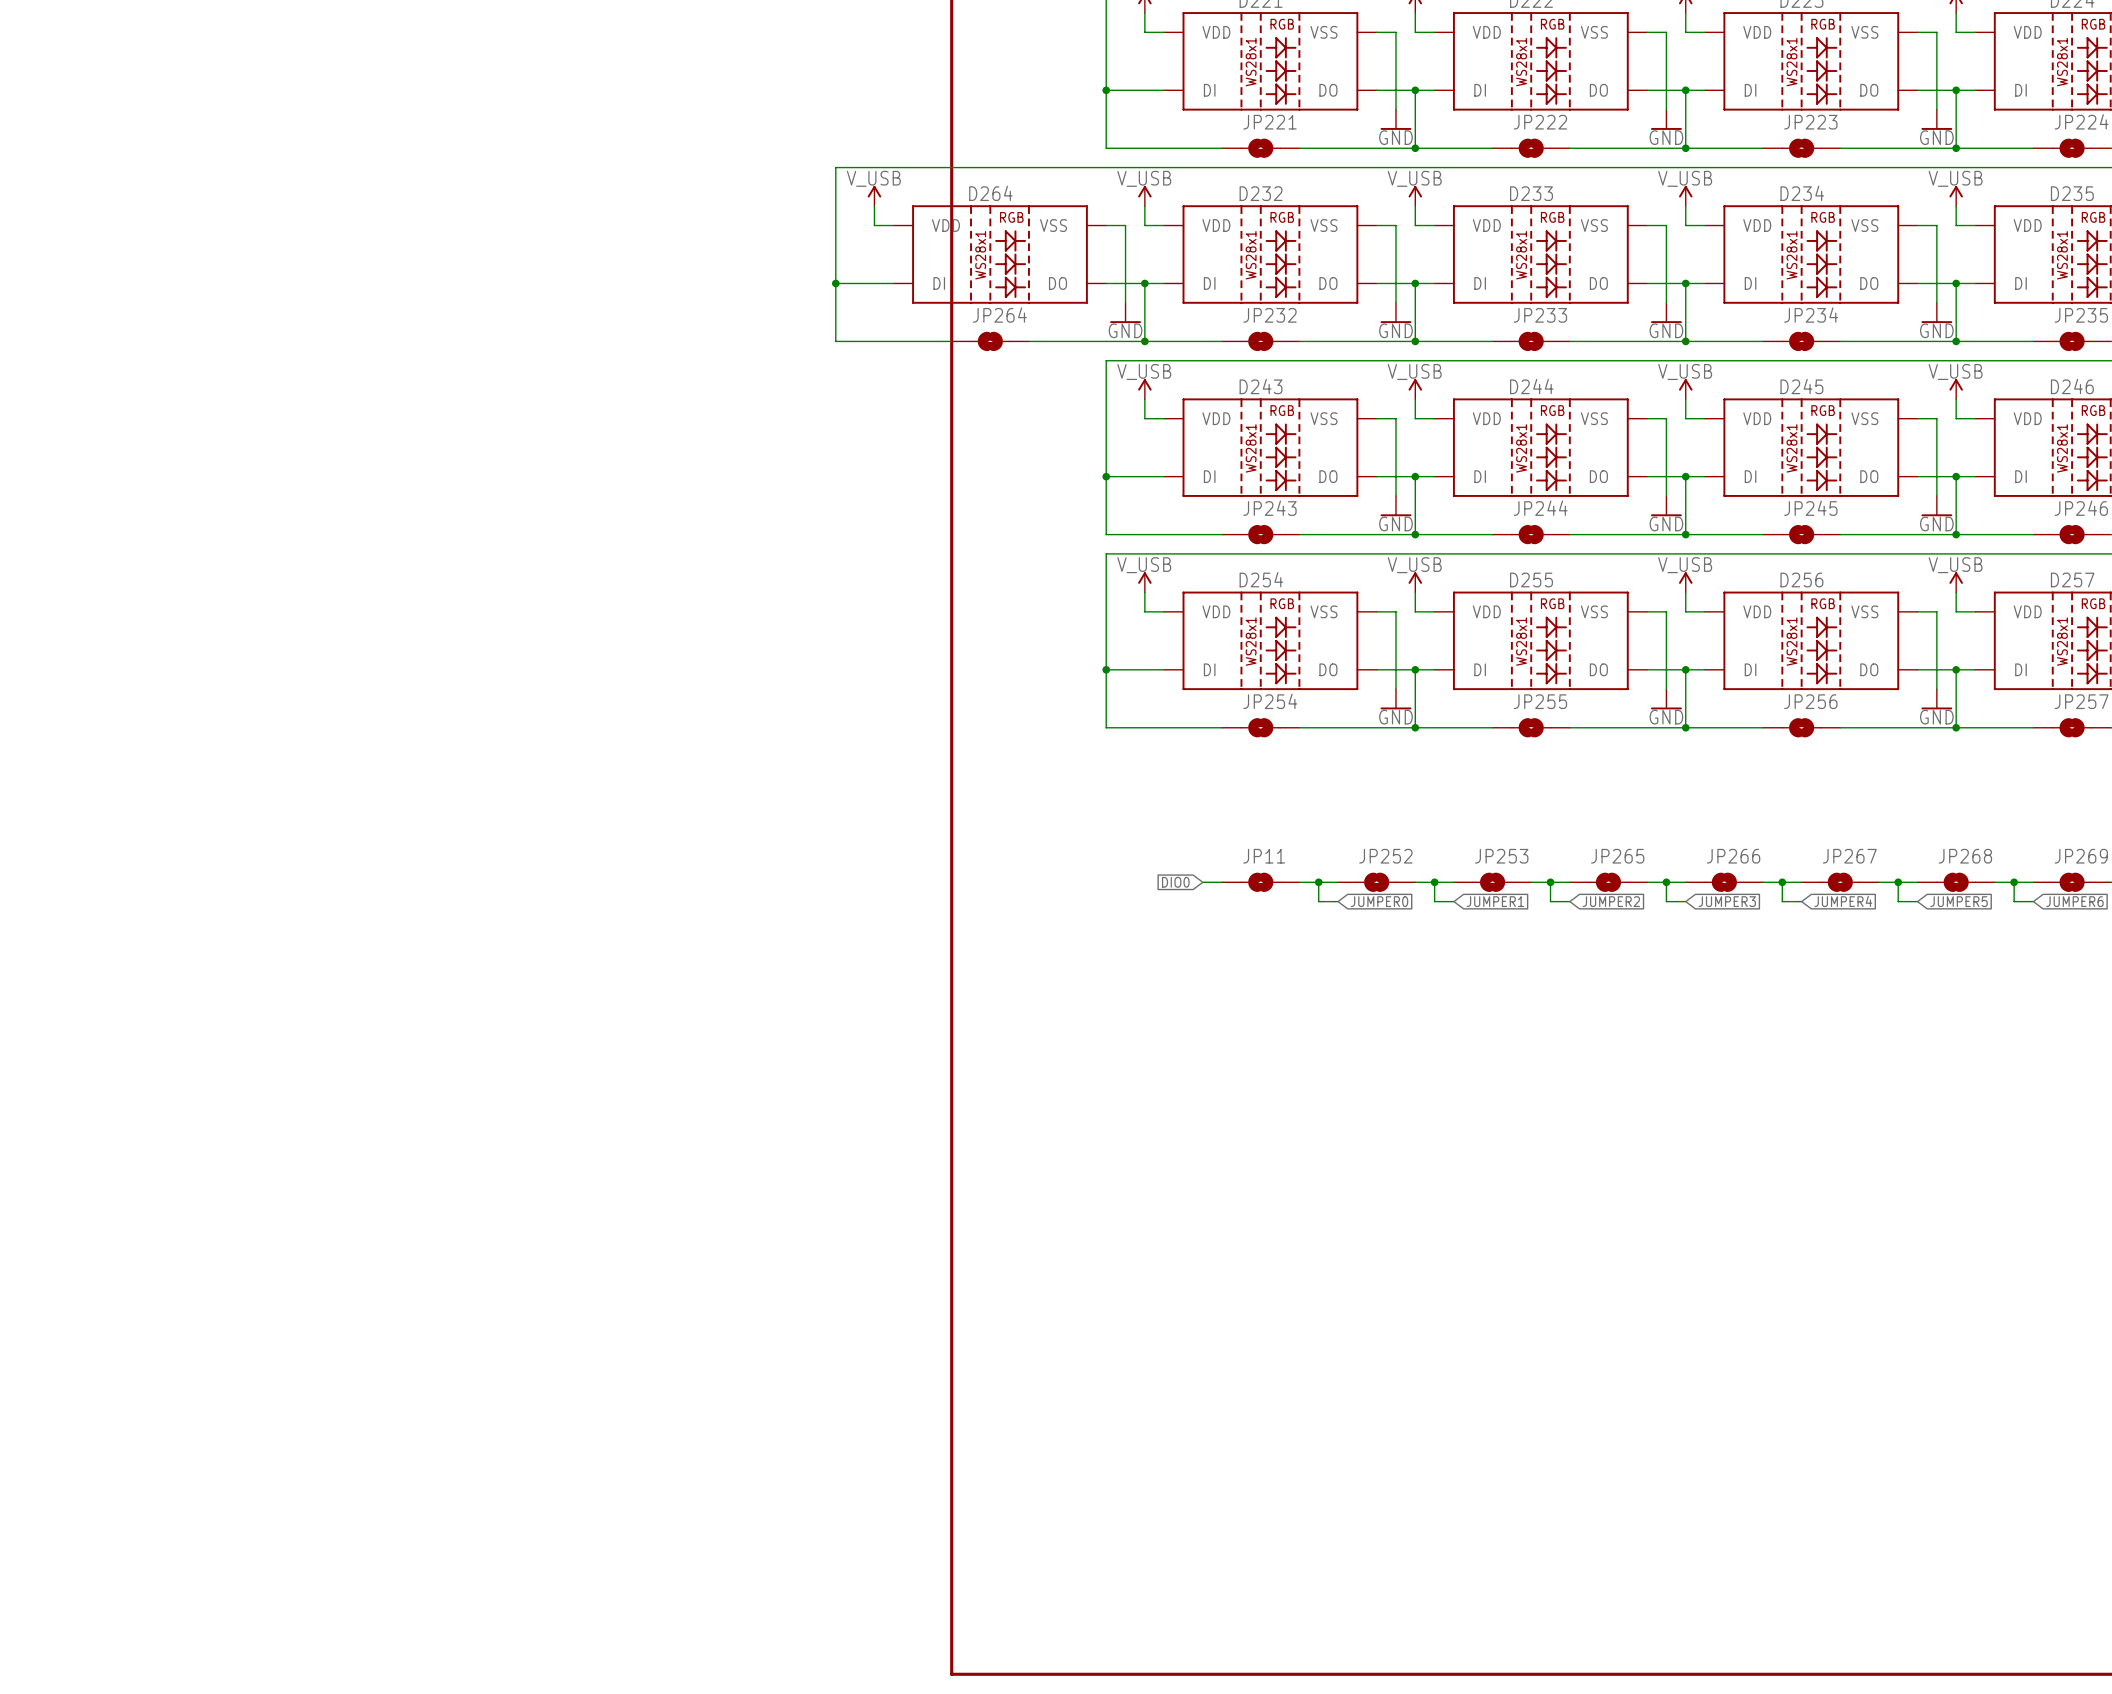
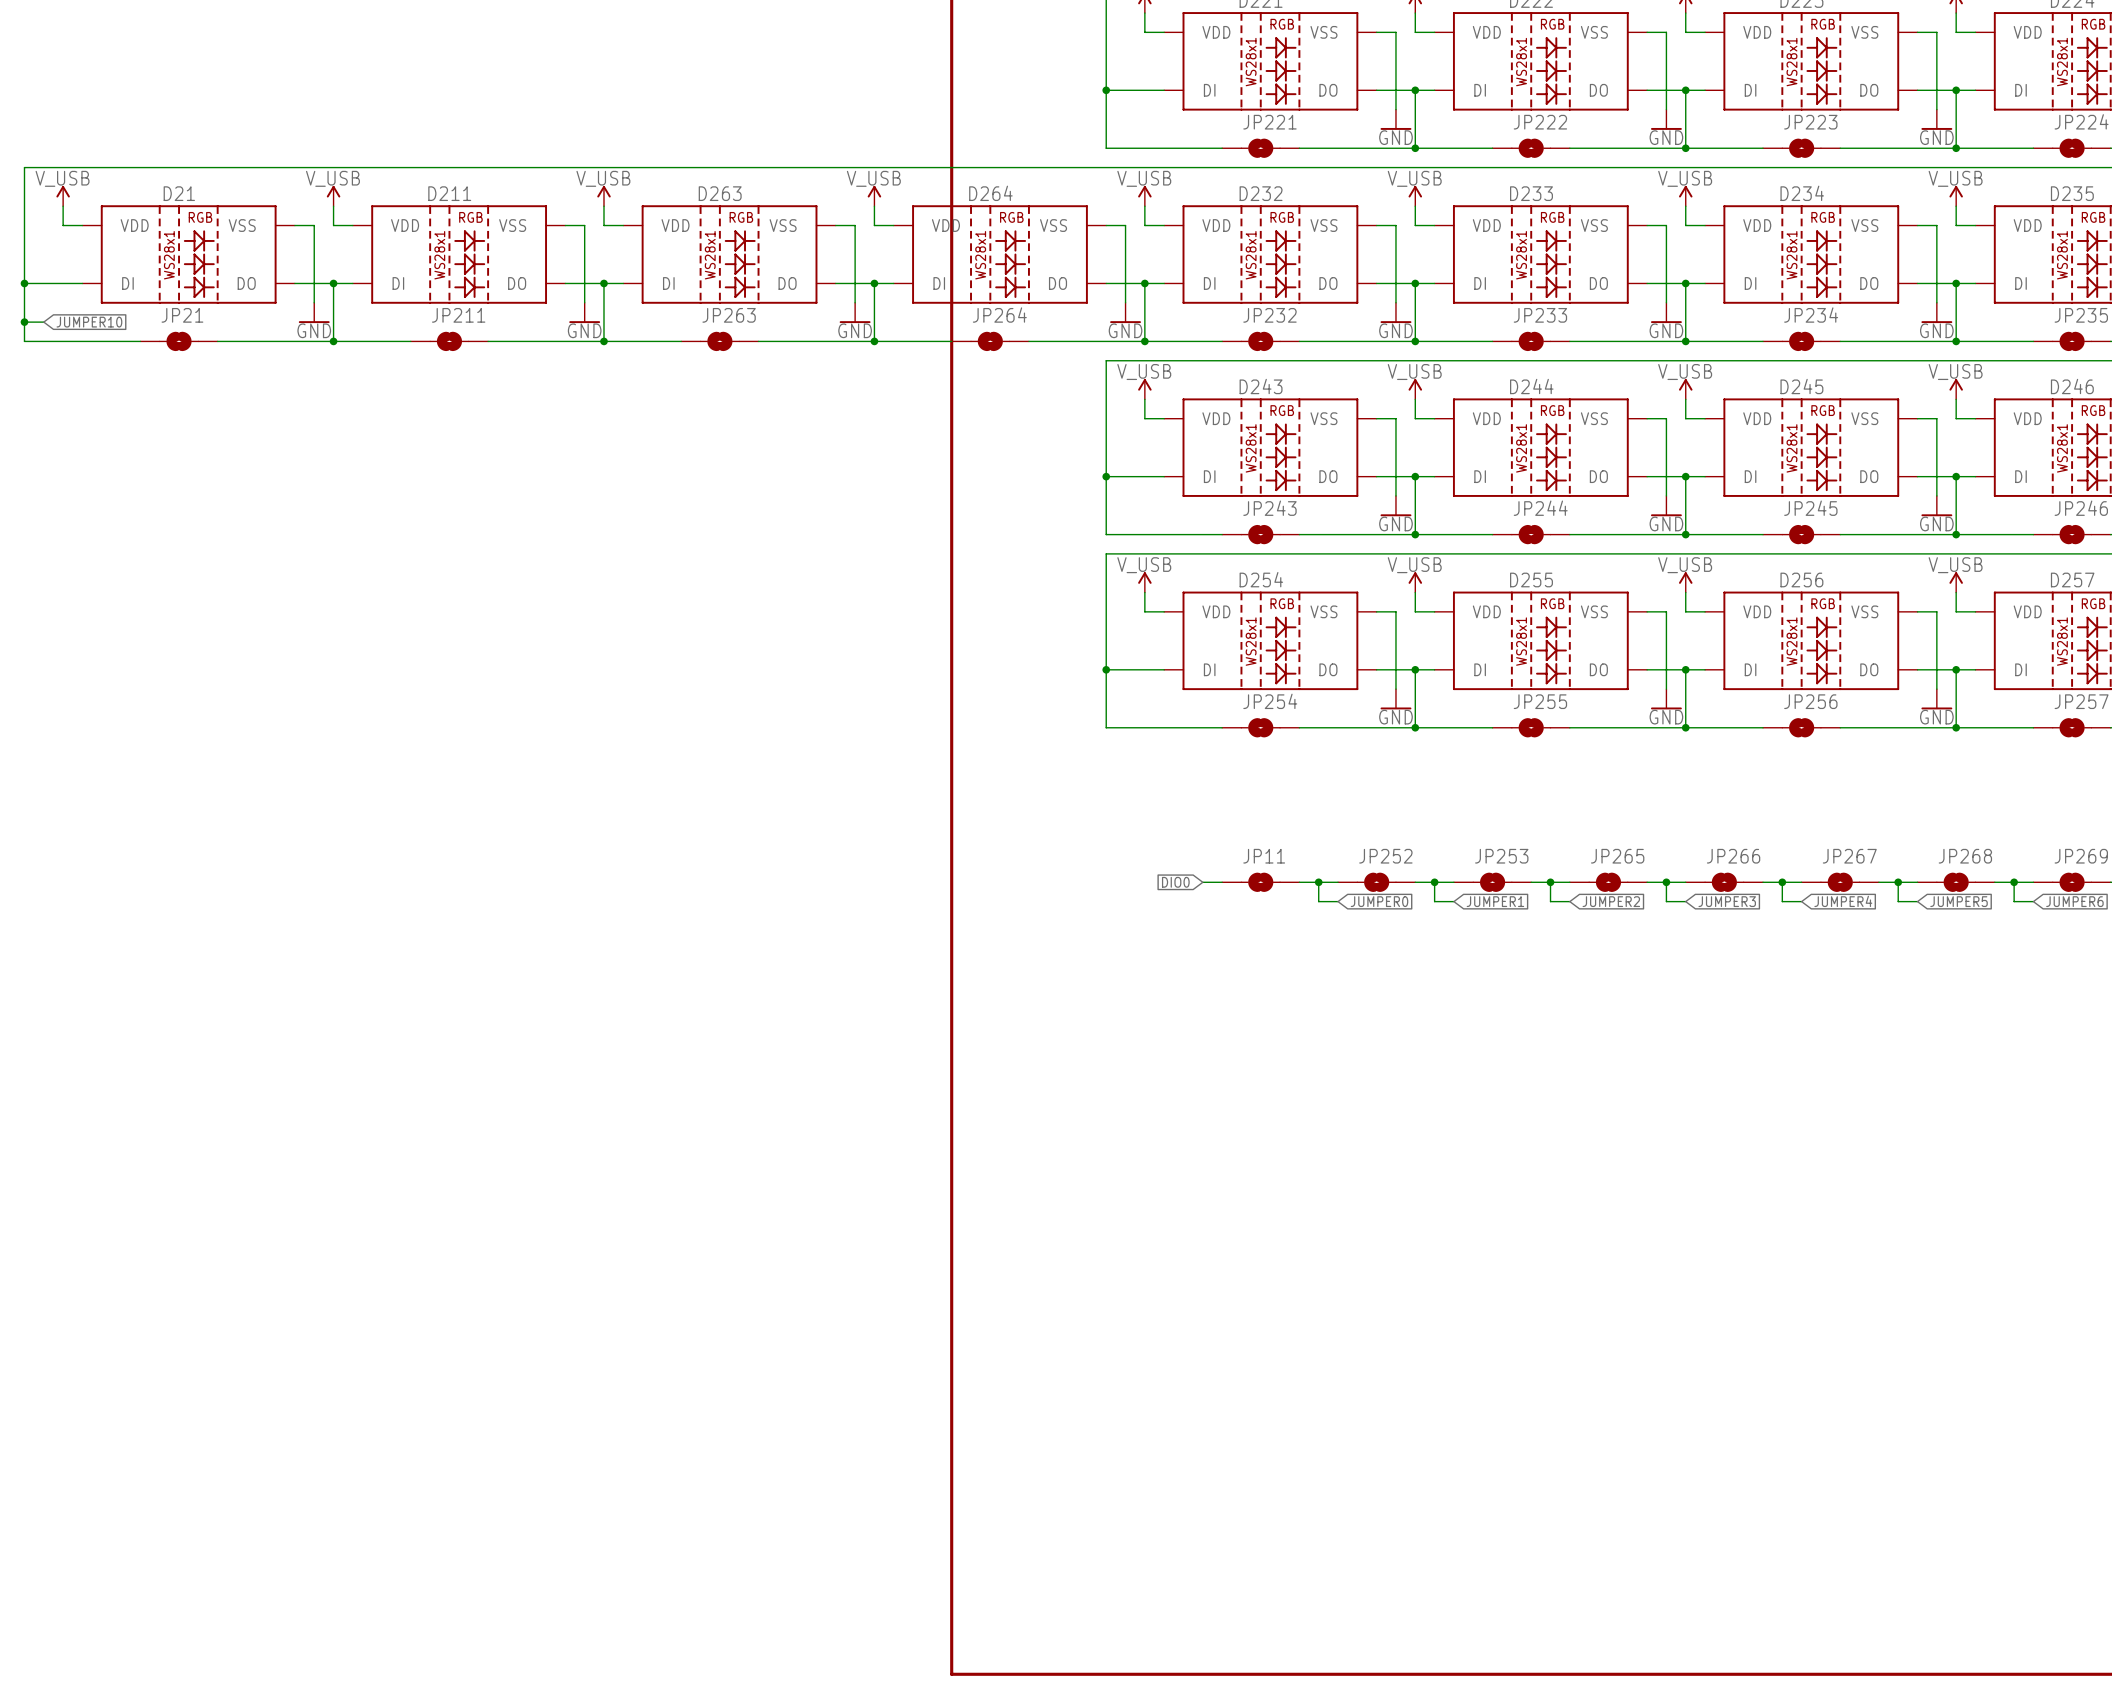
wire: (835, 167) (835, 341) -> (758, 341) (835, 341)
wire: none -> (835, 167) (24, 167) (24, 341) (140, 341)
power symbol: none -> V_USB (63, 196)
power symbol: none -> V_USB (333, 196)
power symbol: none -> V_USB (603, 196)
wire: none -> (63, 206) (63, 225) (82, 225)
wire: none -> (333, 206) (333, 225) (352, 225)
wire: none -> (603, 206) (603, 225) (623, 225)
wire: none -> (294, 225) (314, 225) (314, 302)
wire: none -> (565, 225) (584, 225) (584, 302)
wire: none -> (835, 225) (855, 225) (855, 302)
D21: none -> (188, 254)
D211: none -> (459, 254)
D263: none -> (729, 254)
wire: none -> (24, 283) (82, 283)
junction: none -> (24, 283)
wire: none -> (294, 283) (352, 283)
wire: none -> (333, 283) (333, 341)
junction: none -> (333, 283)
wire: none -> (565, 283) (623, 283)
wire: none -> (603, 283) (603, 341)
junction: none -> (603, 283)
junction: (835, 283) -> none
wire: none -> (874, 283) (874, 341)
junction: none -> (874, 283)
power symbol: none -> GND (314, 312)
power symbol: none -> GND (584, 312)
power symbol: none -> GND (855, 312)
wire: none -> (24, 322) (43, 322)
junction: none -> (24, 322)
global label: none -> JUMPER10 (89, 322)
JP21: none -> (179, 341)
wire: none -> (217, 341) (410, 341)
junction: none -> (333, 341)
JP211: none -> (449, 341)
wire: none -> (488, 341) (681, 341)
junction: none -> (603, 341)
JP263: none -> (719, 341)
junction: none -> (874, 341)

